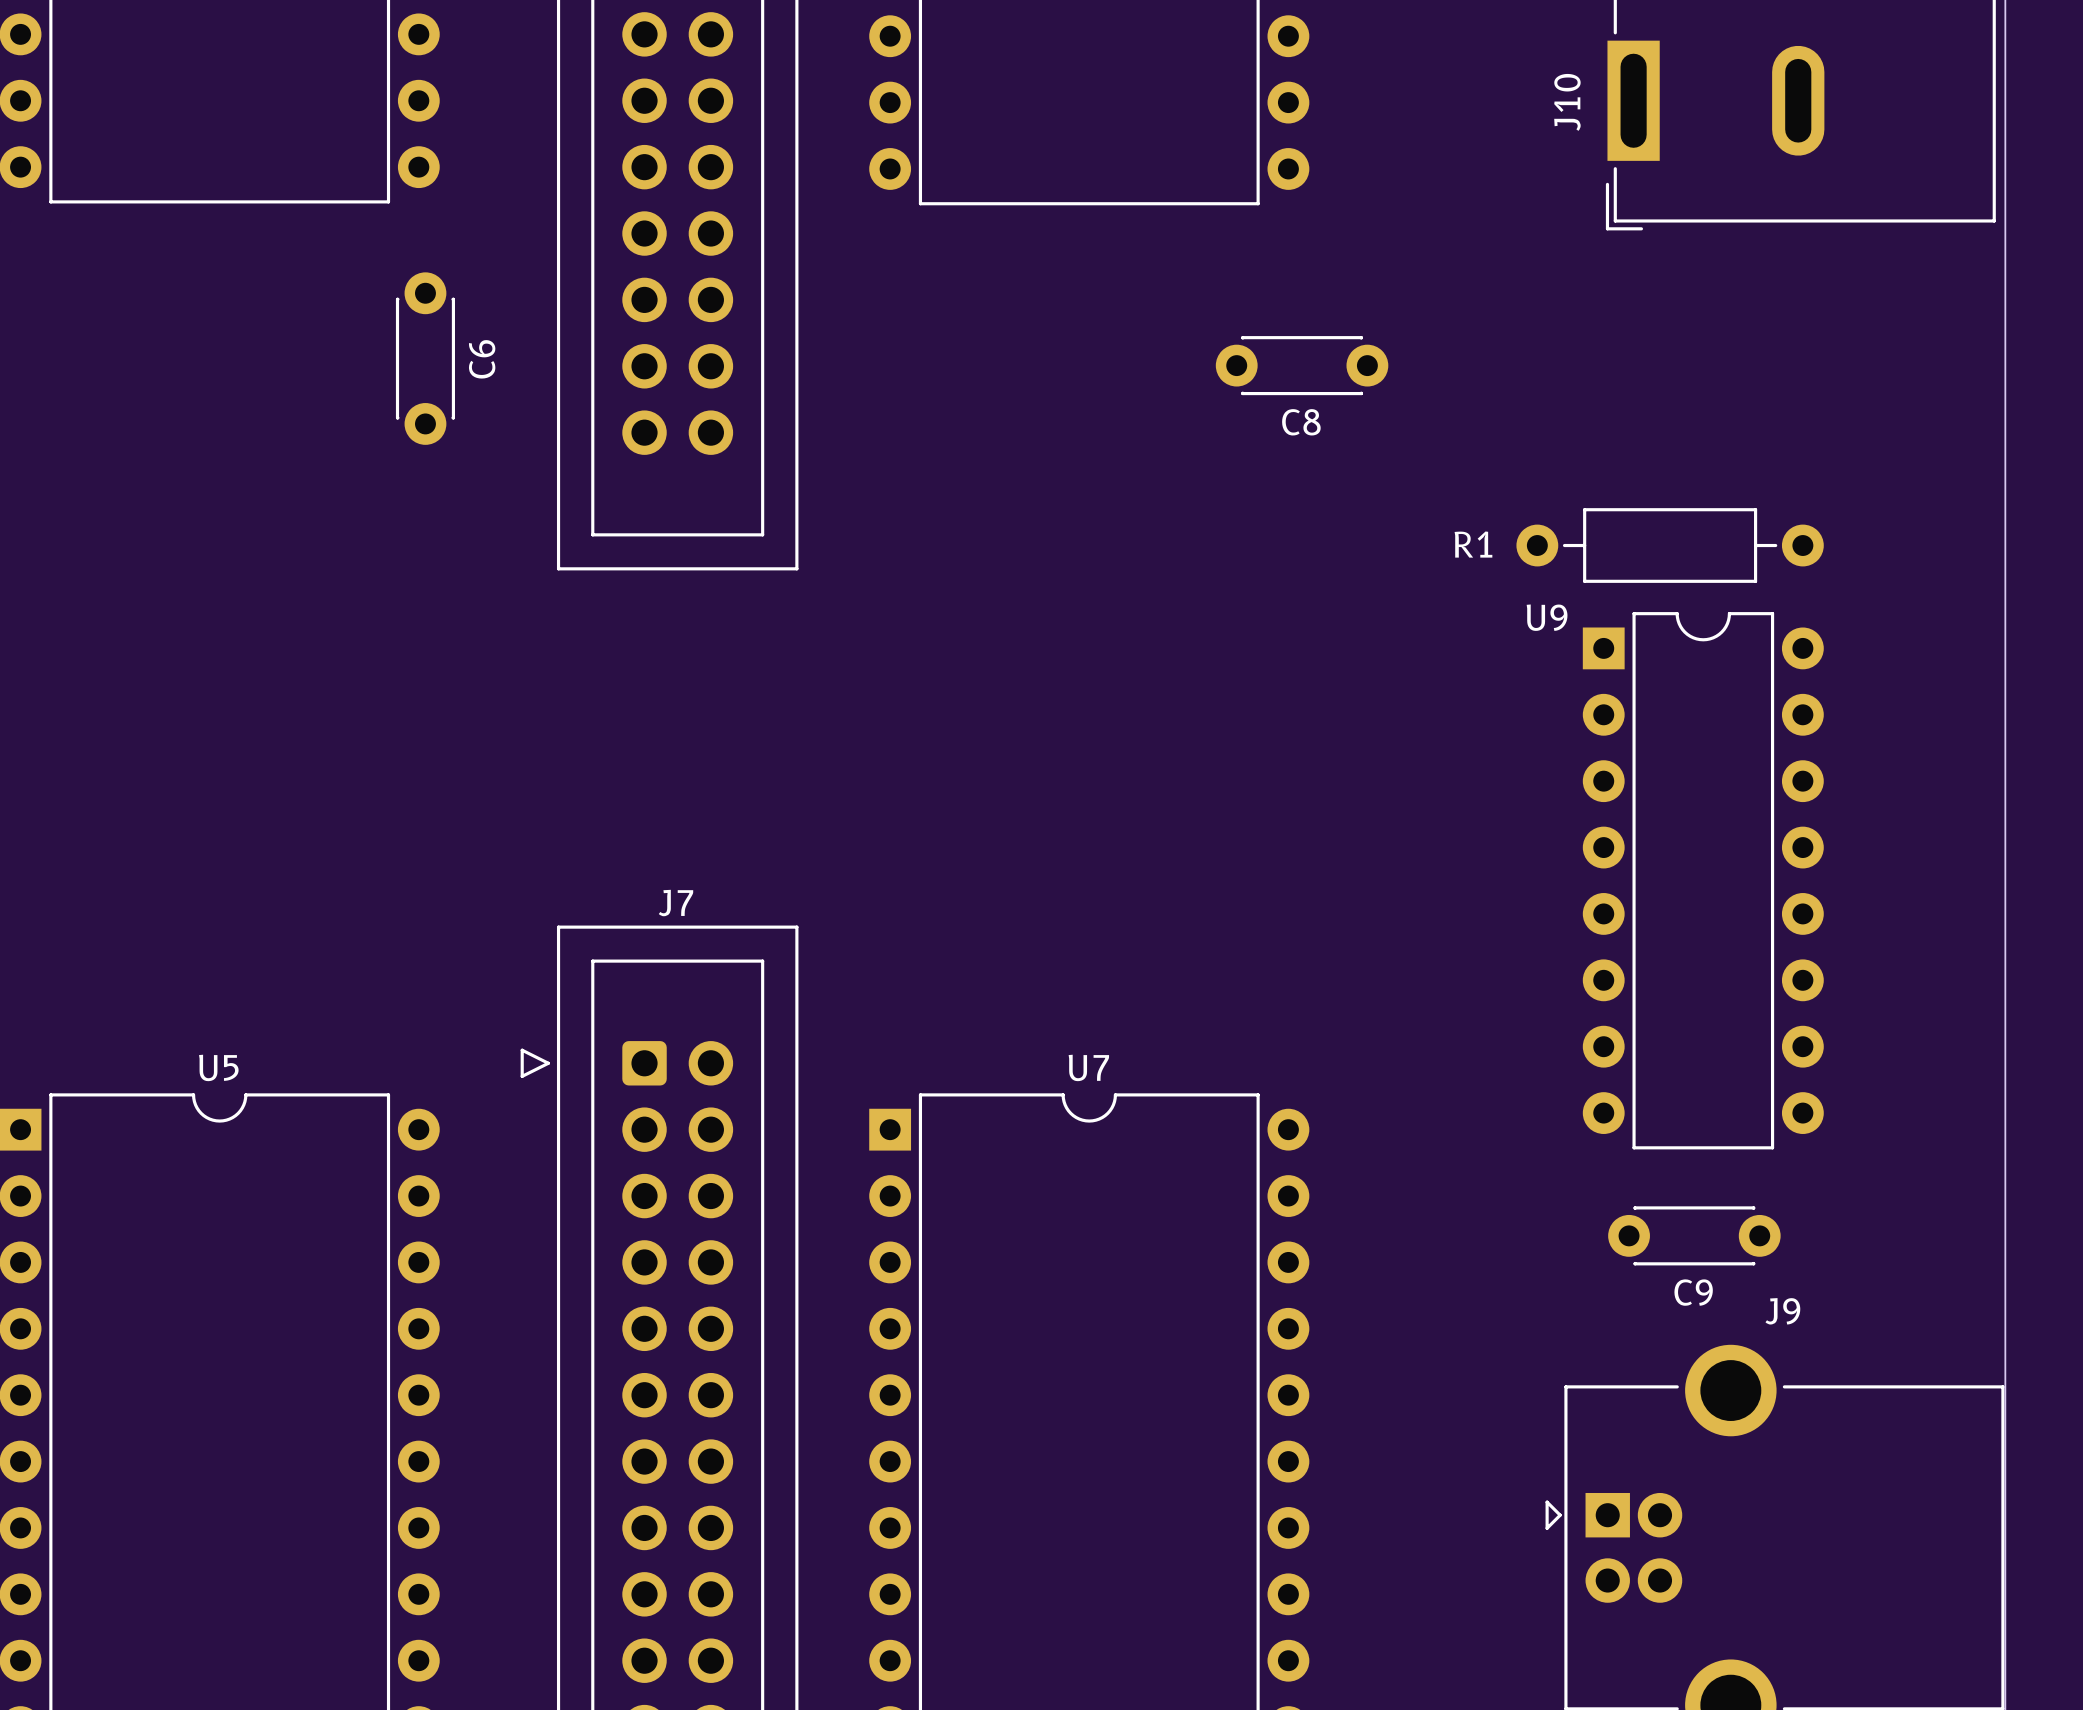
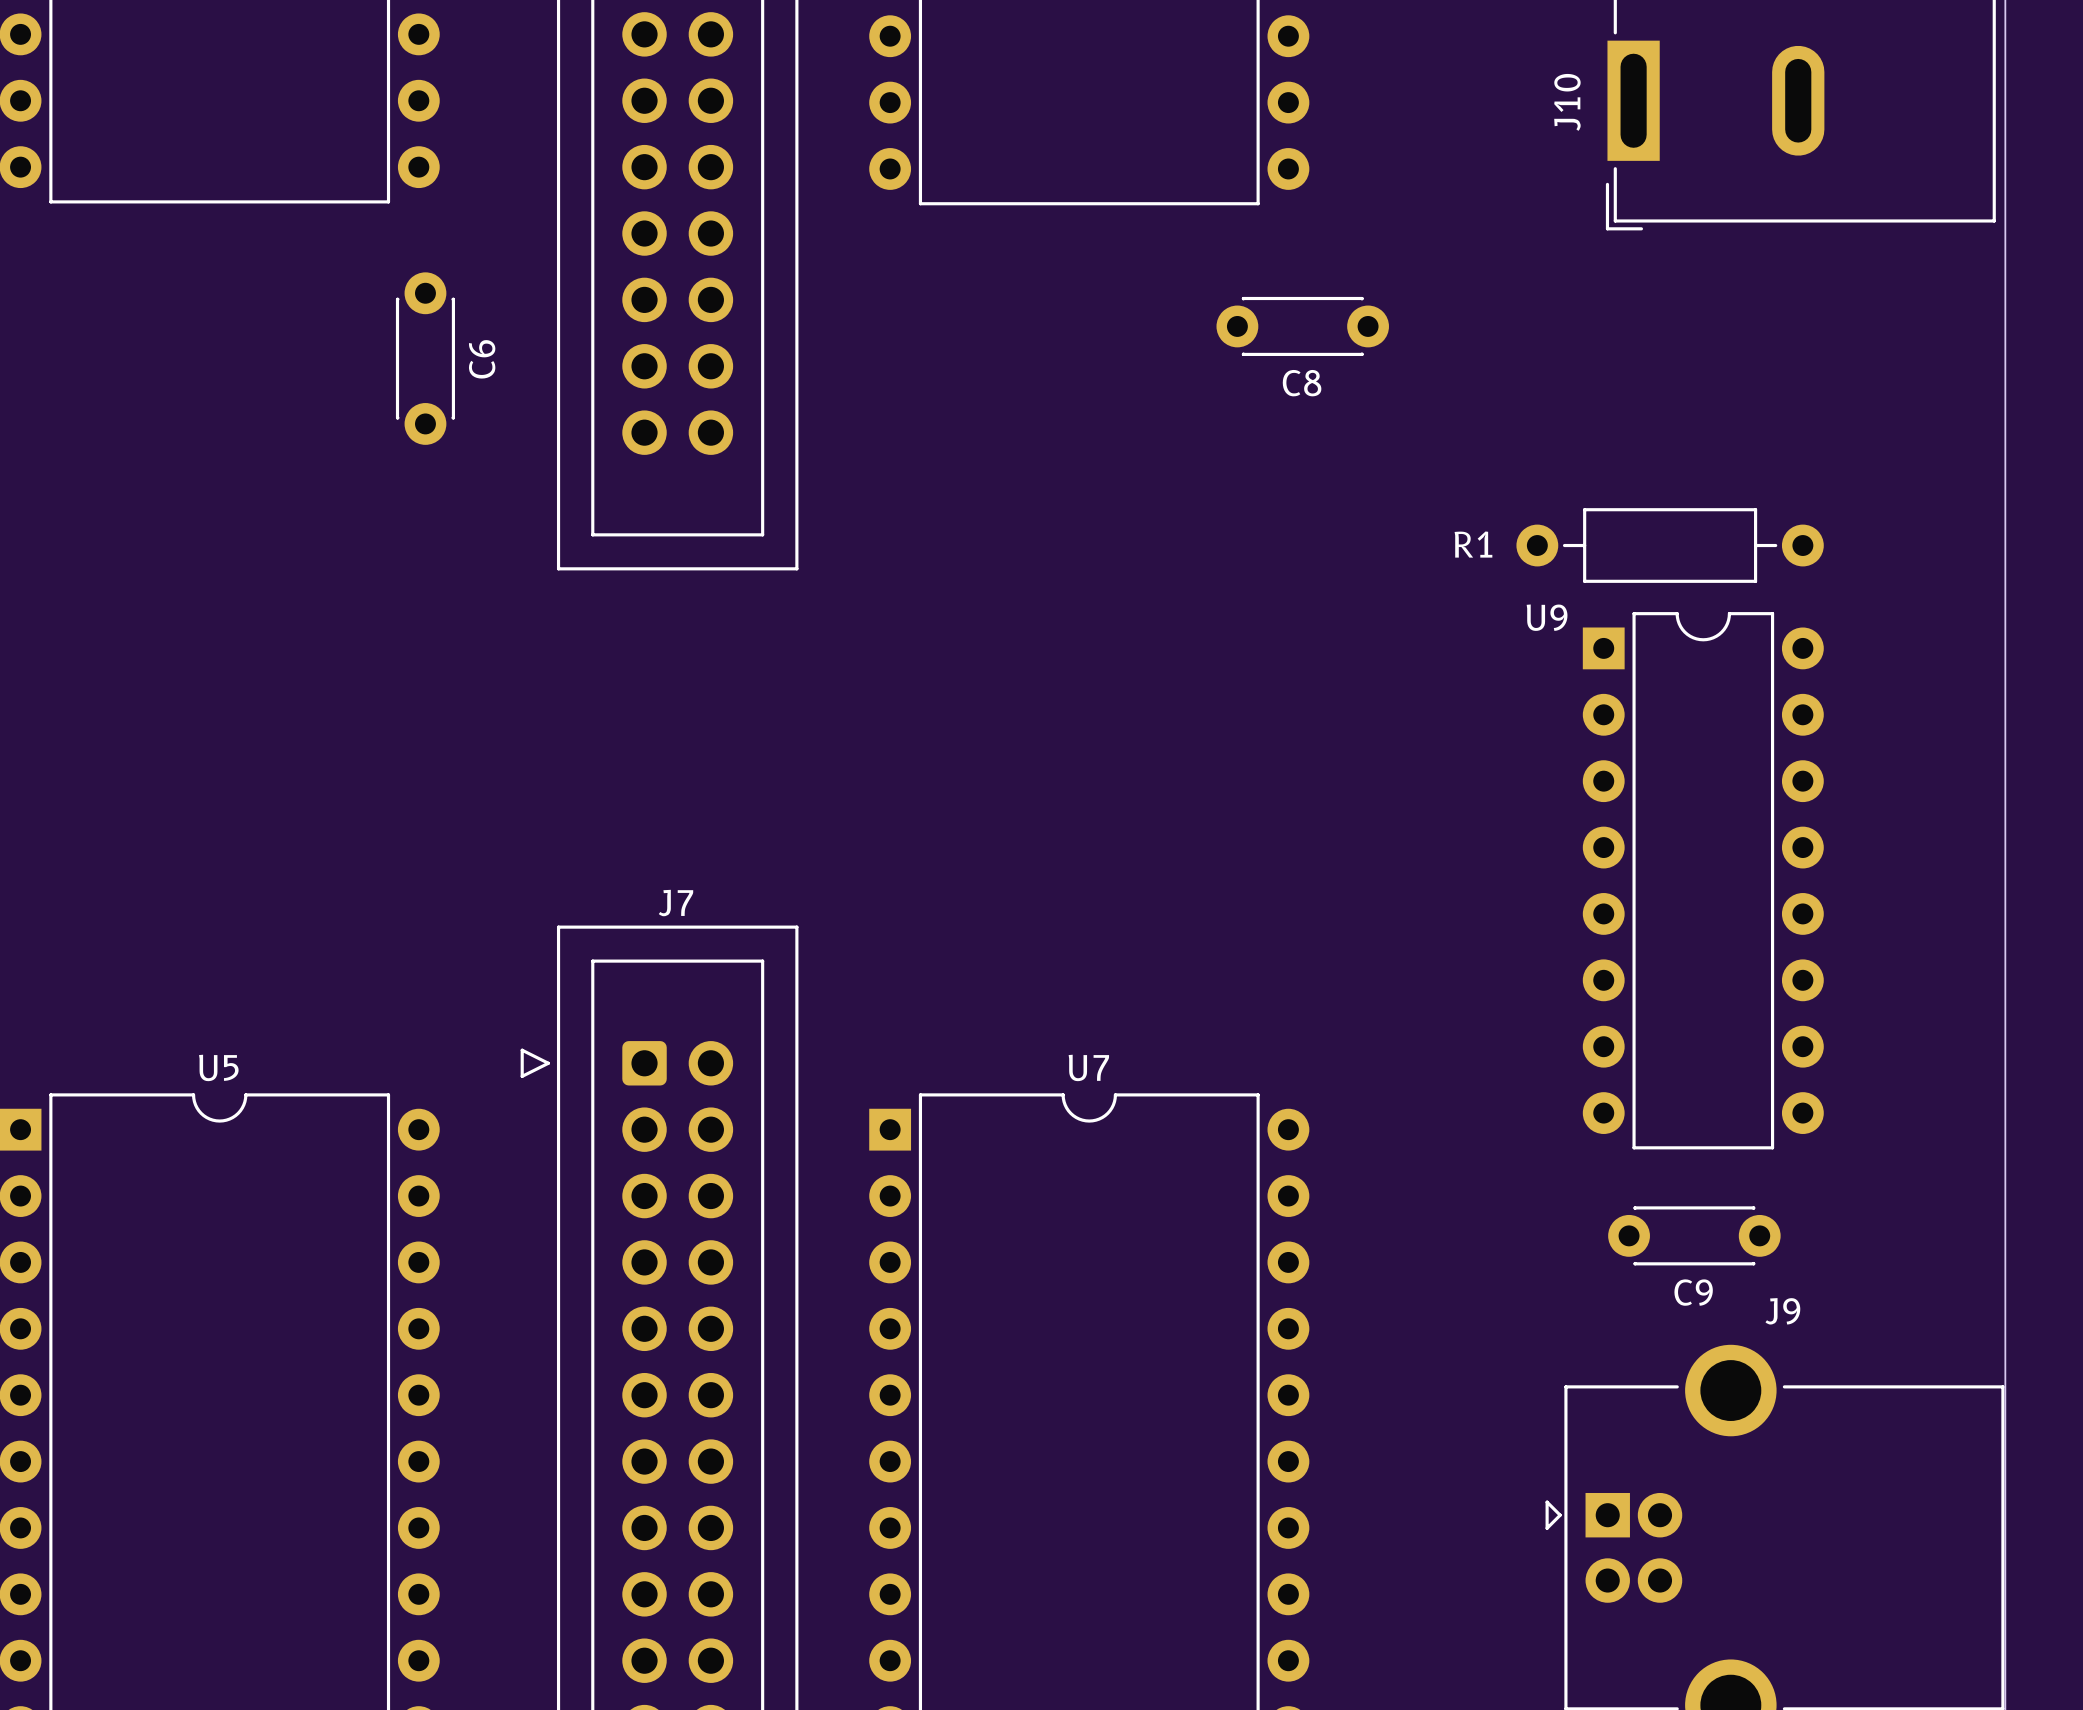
C8 position: (1302, 365) -> (1302, 326)

